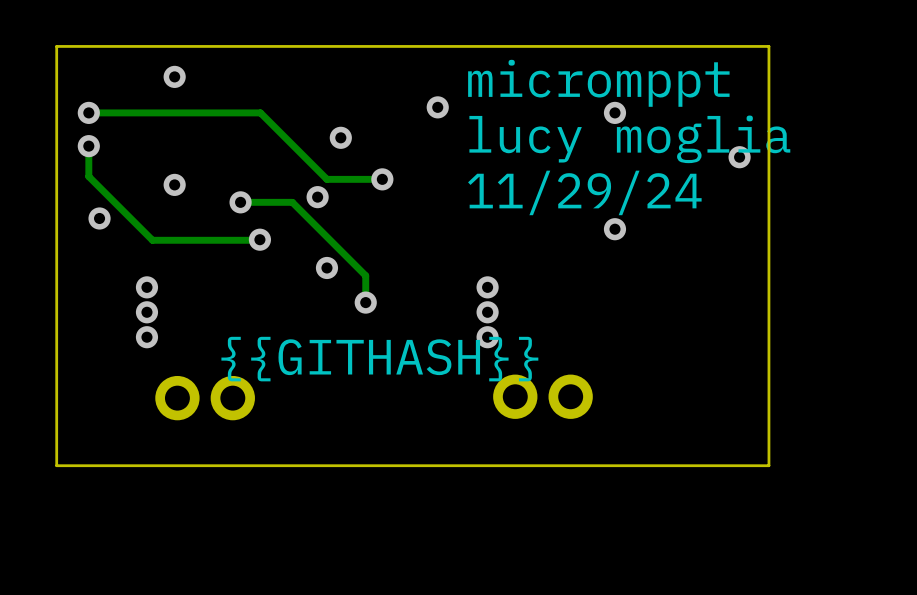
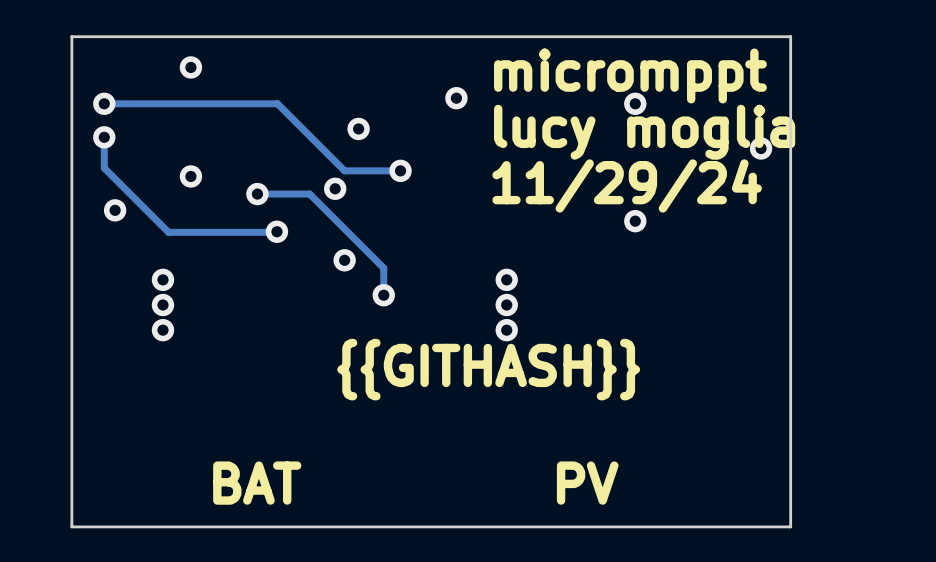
text position: {{GITHASH}} (379, 359) -> {{GITHASH}} (488, 369)
part: (542, 396) -> none
part: (205, 398) -> none
board edge: (768, 465) (56, 465) -> (790, 459) (790, 526) (71, 526) (71, 459)
text: none -> BAT (257, 483)
text: none -> PV (587, 483)

